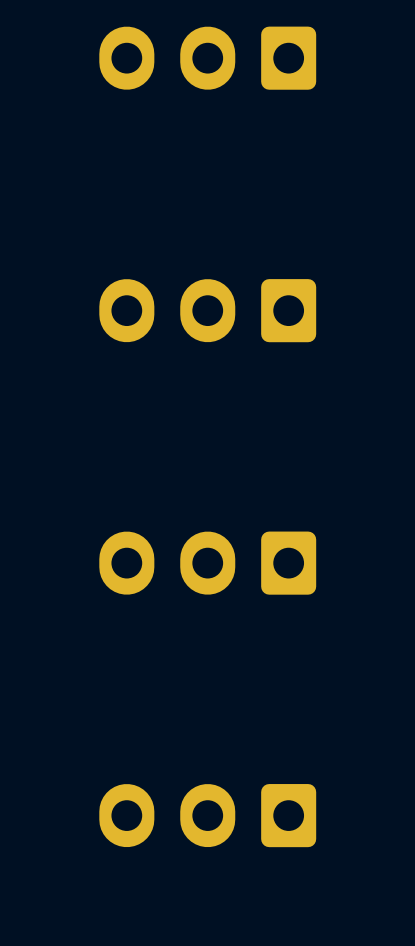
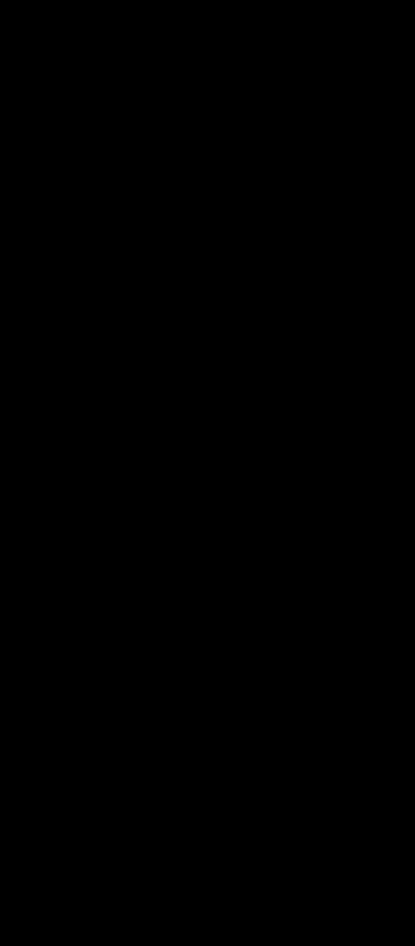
part: (207, 58) -> none
part: (207, 310) -> none
part: (207, 563) -> none
part: (207, 815) -> none

